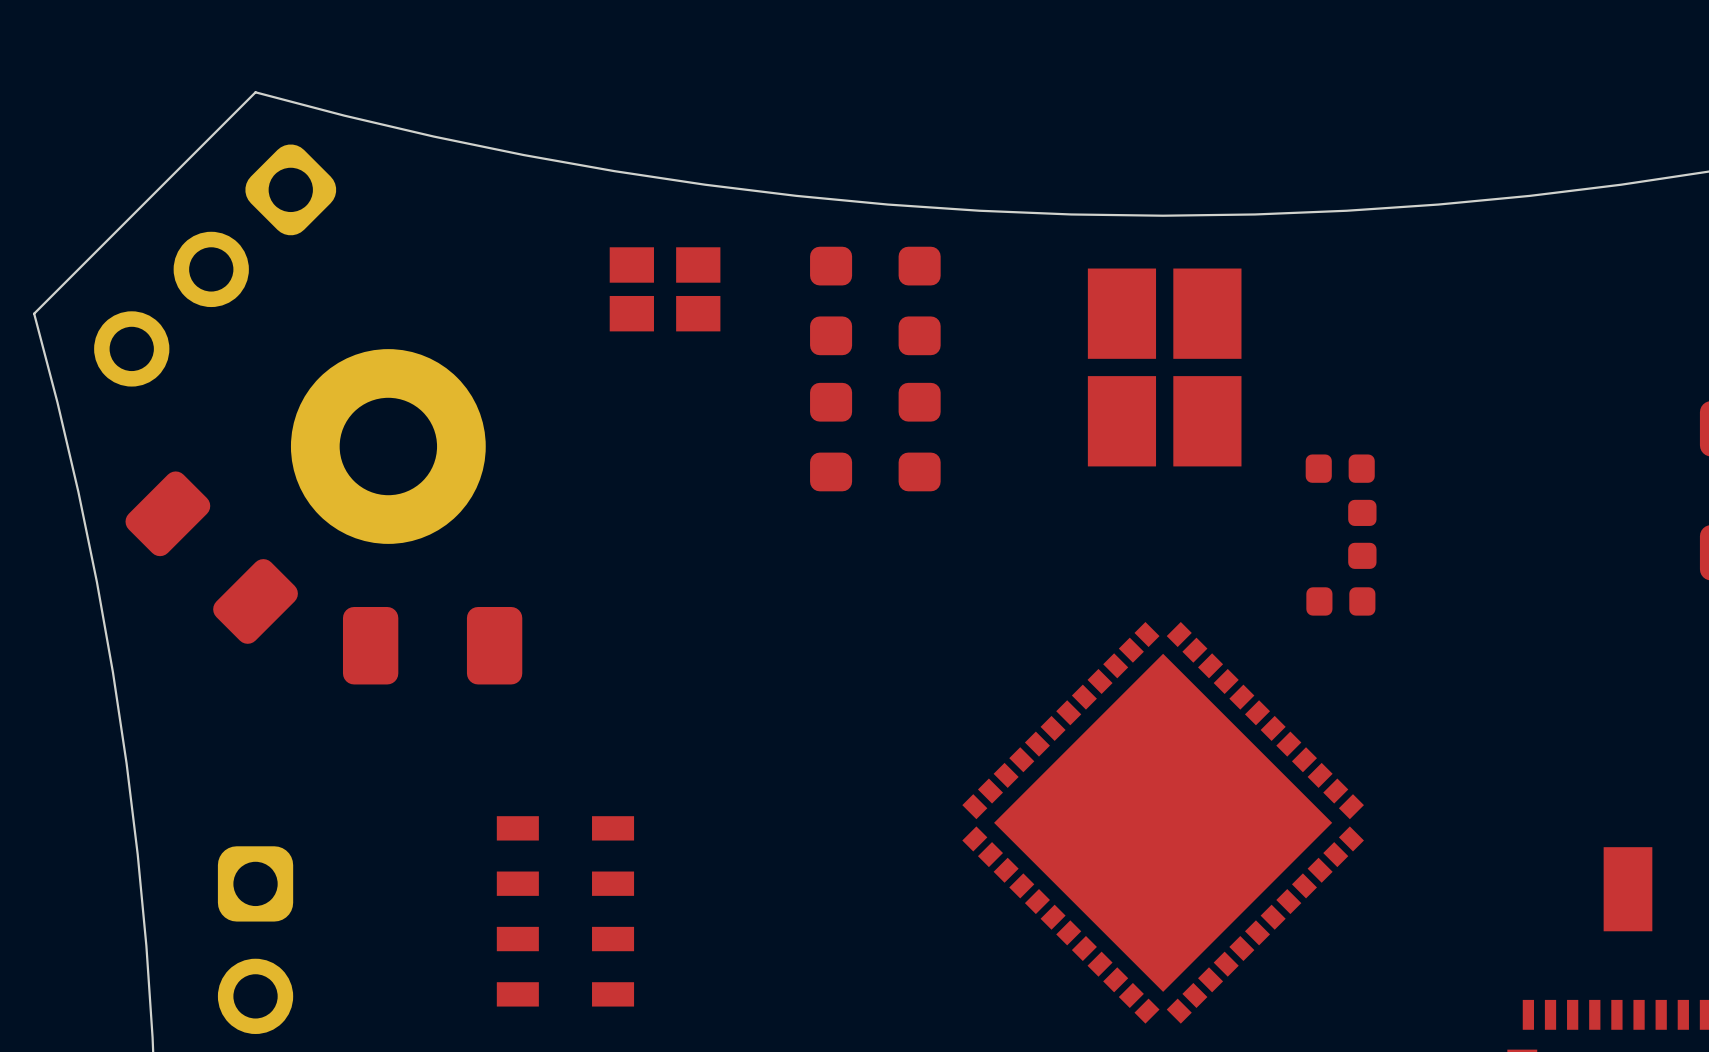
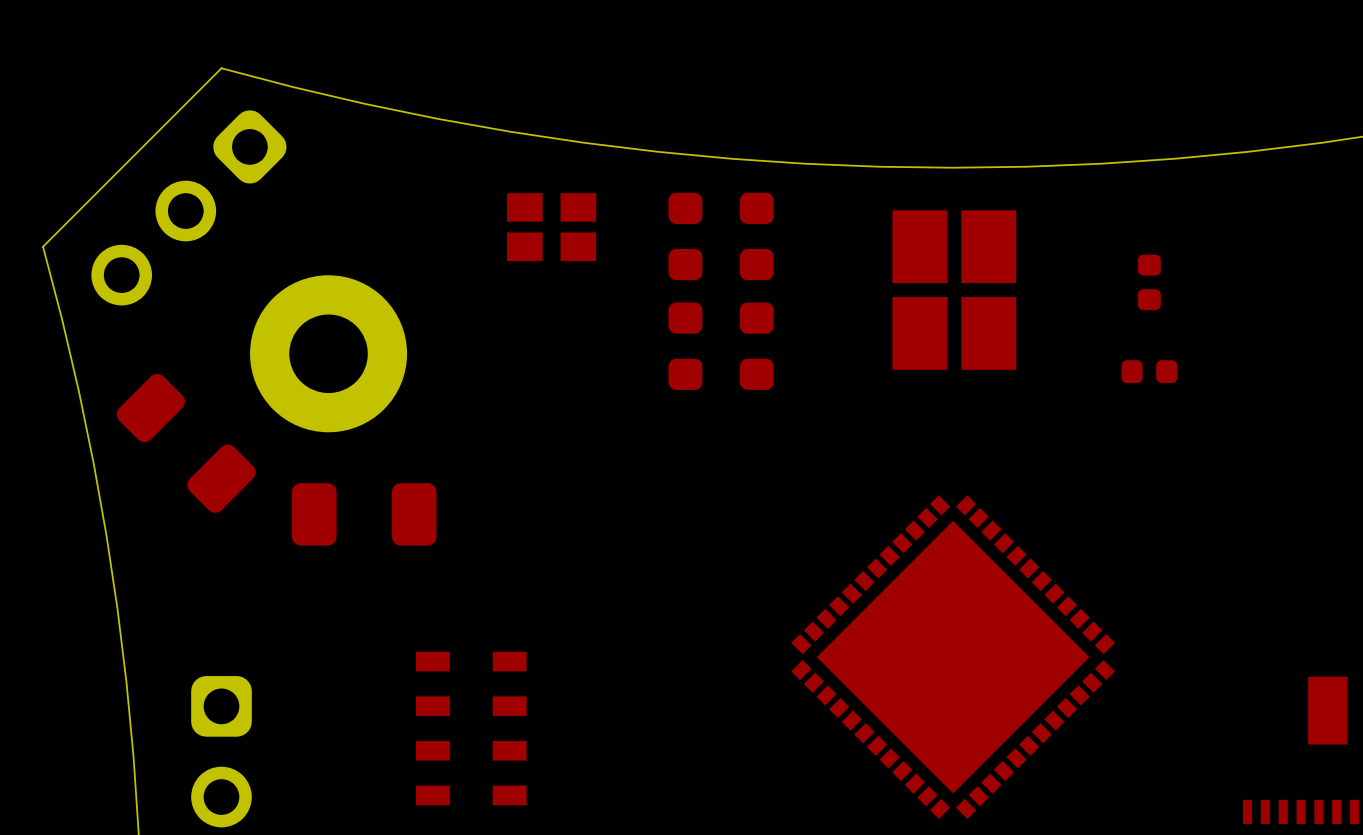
part: none -> (1149, 282)
part: (1340, 468) -> none
part: none -> (1149, 371)
part: (1362, 534) -> none
part: (1340, 601) -> none

